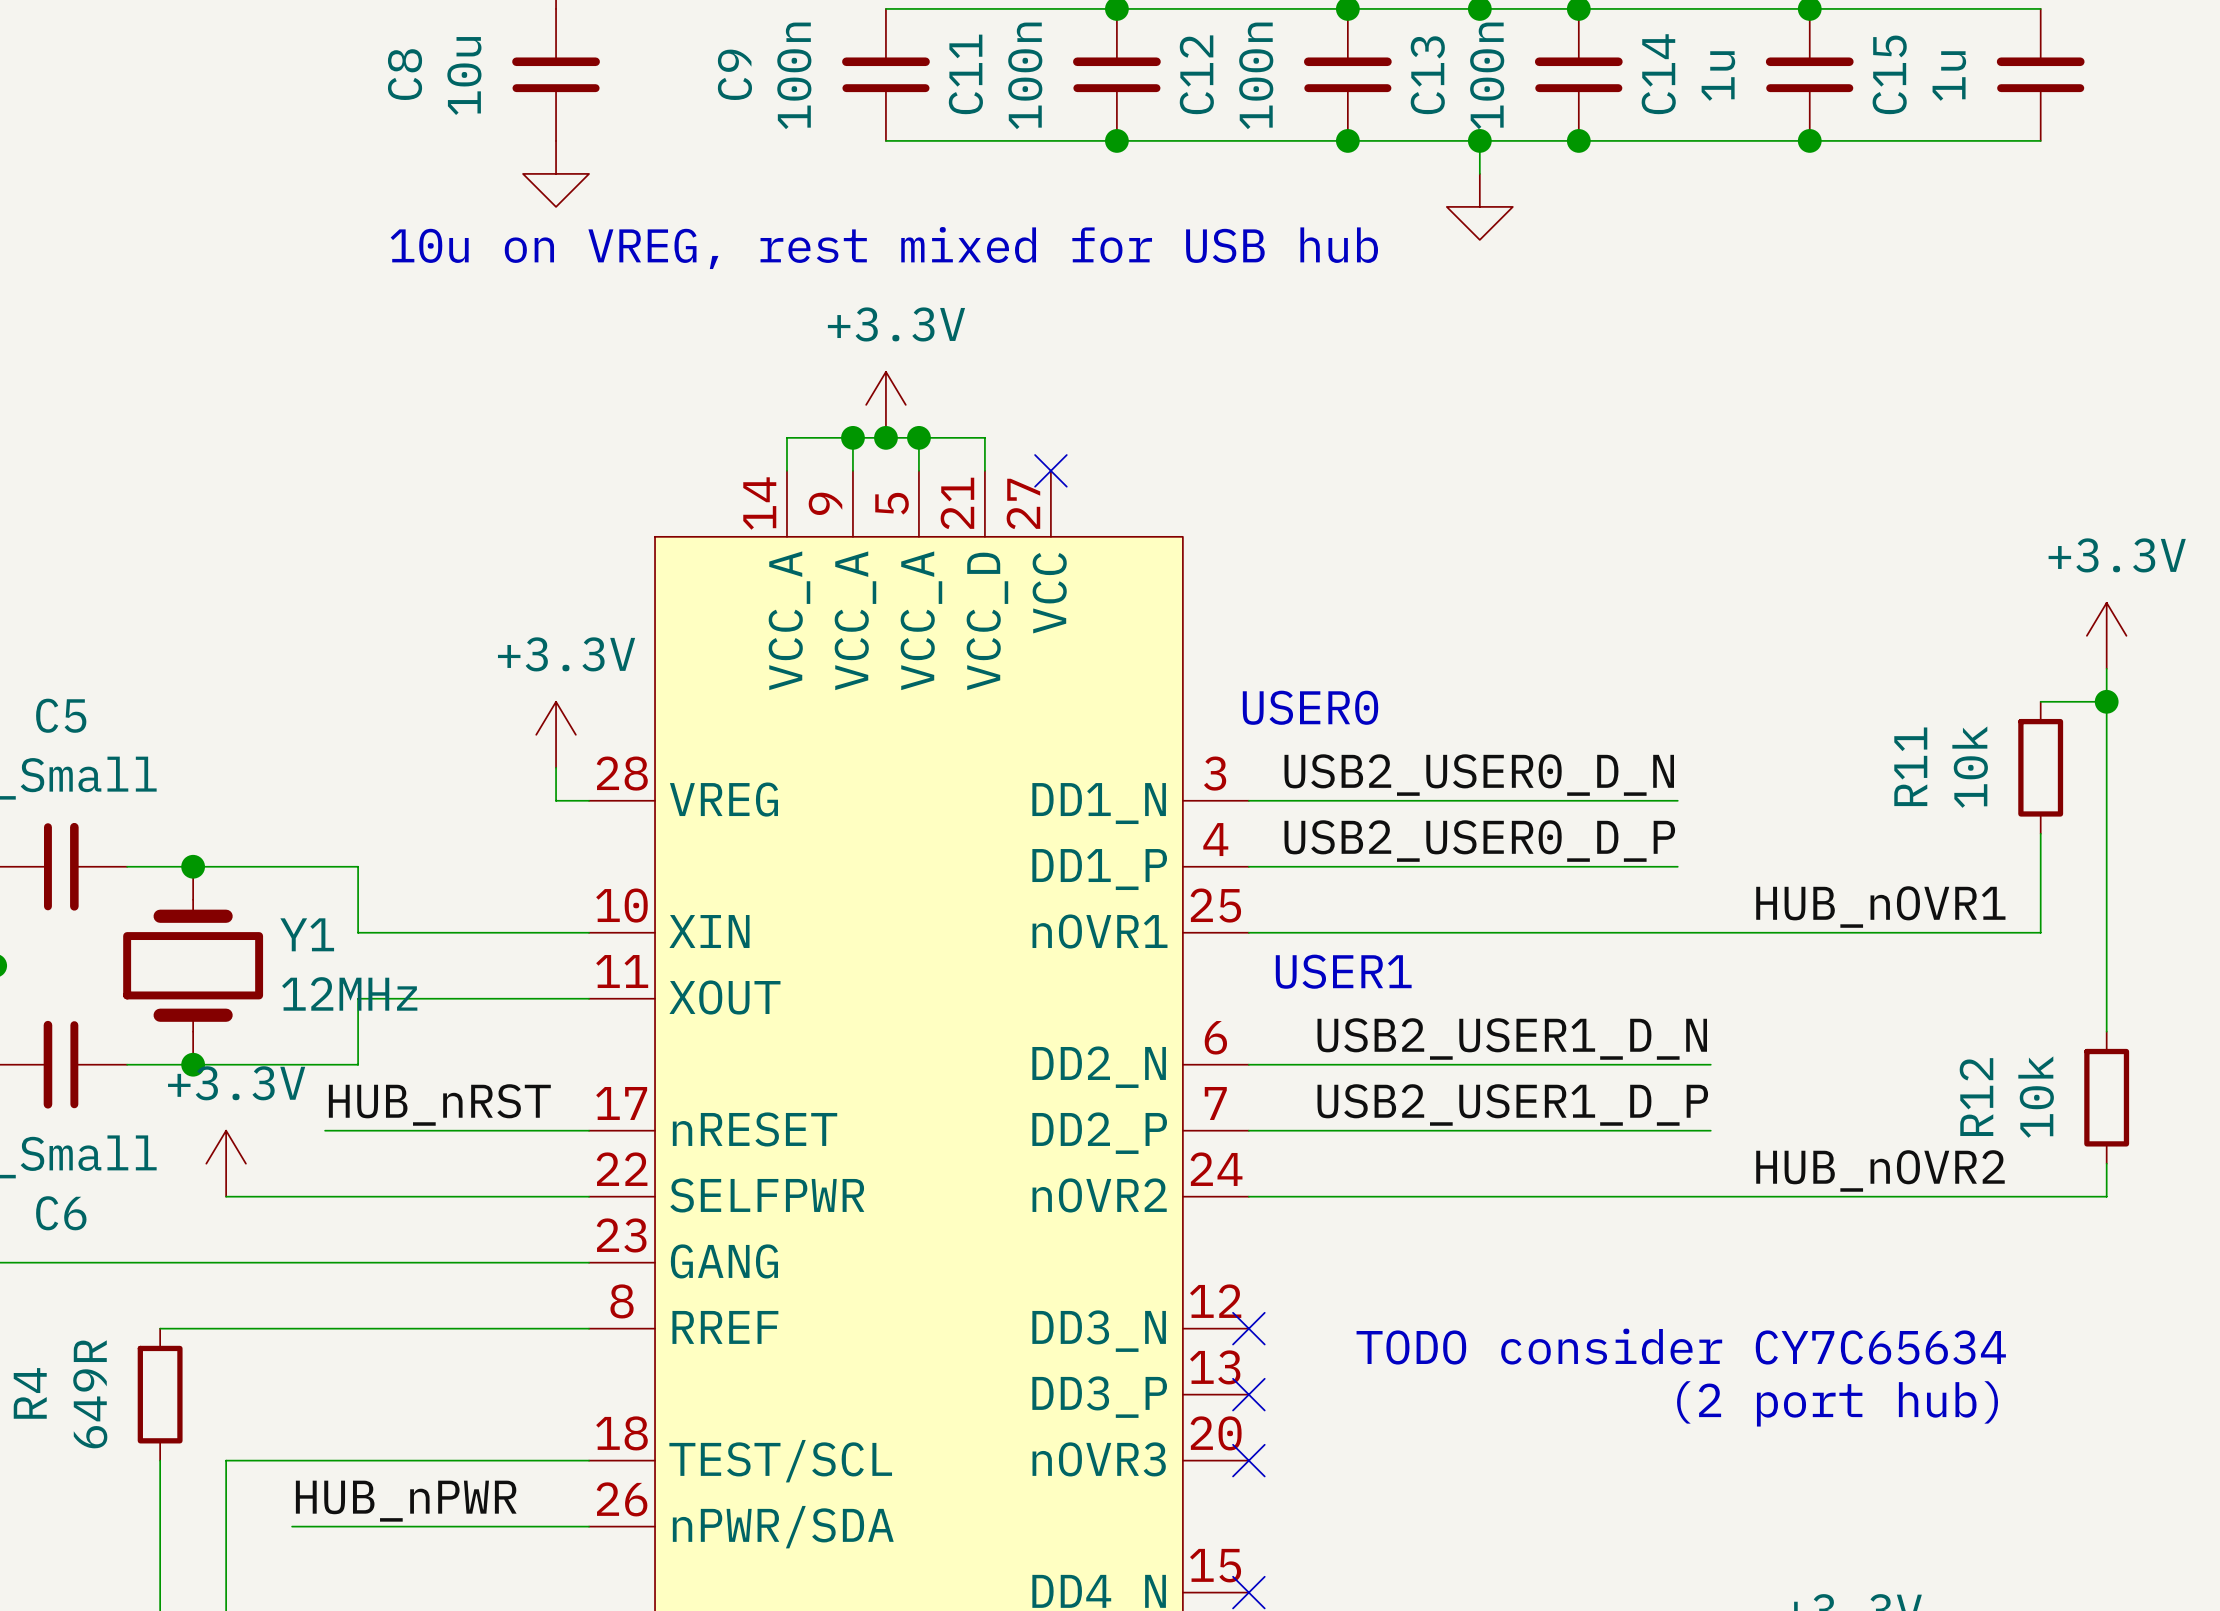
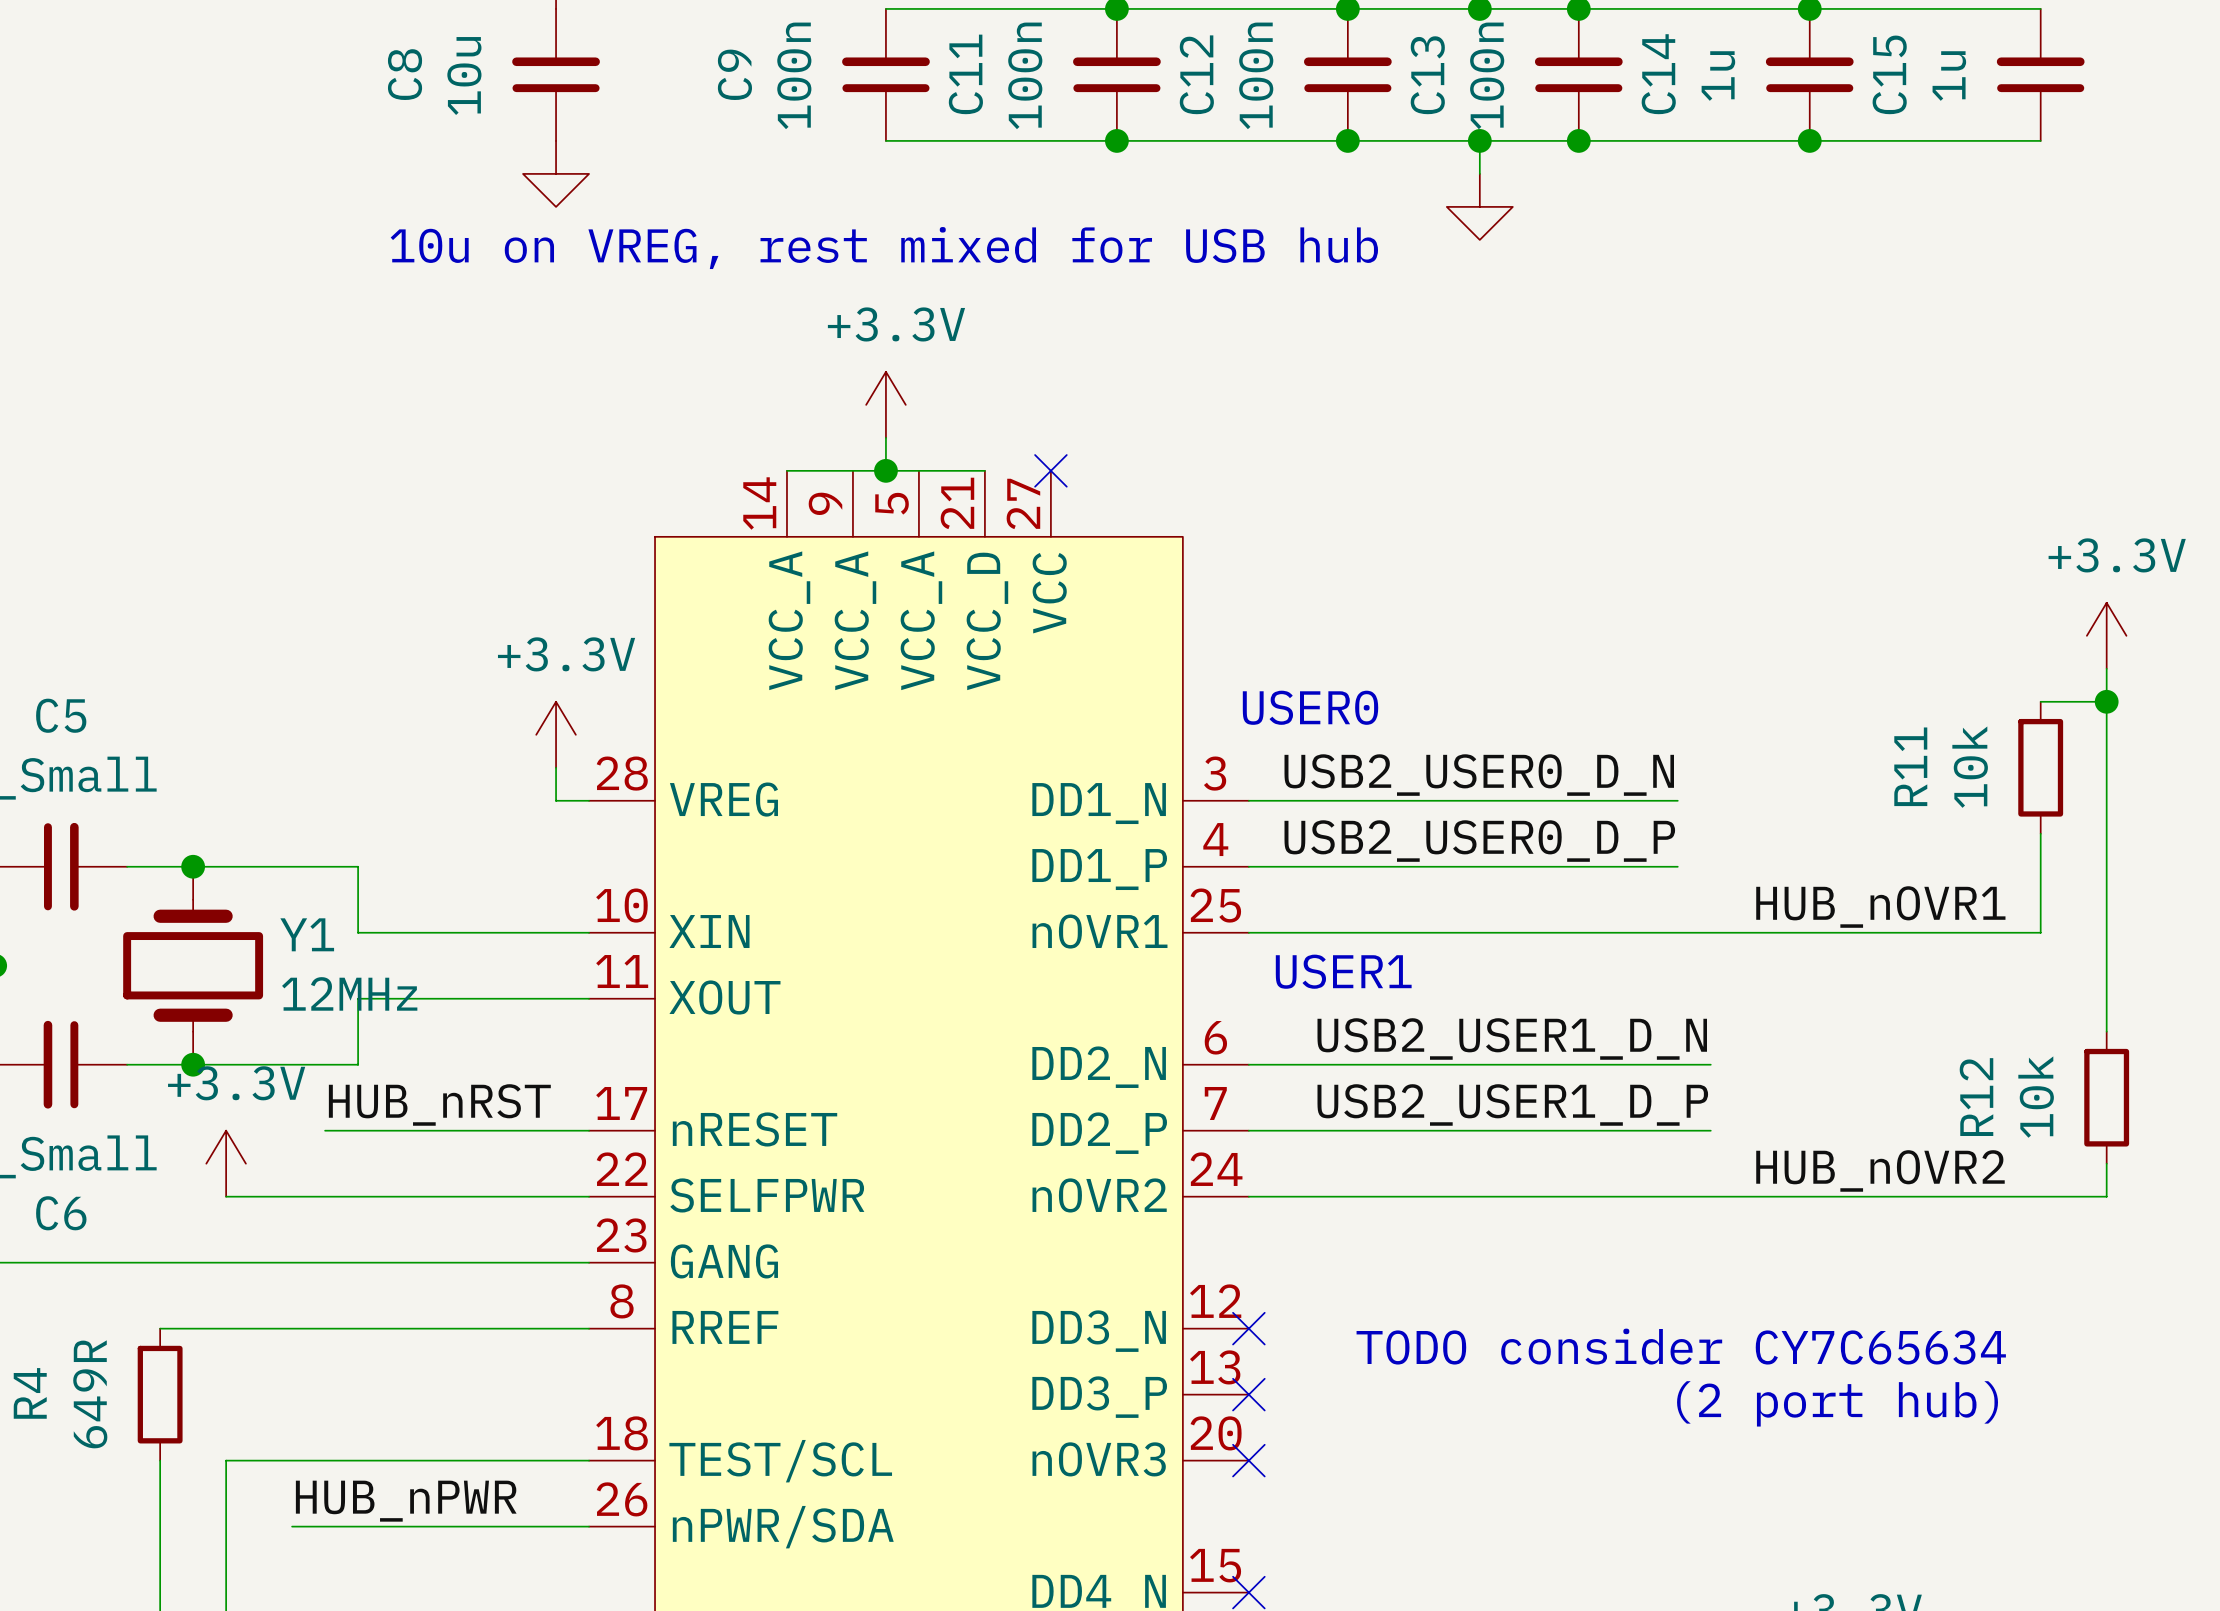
wire: (852, 437) (852, 470) -> none
junction: (852, 437) -> none
junction: (885, 437) -> none
wire: (918, 437) (918, 470) -> (885, 437) (885, 470)
junction: (918, 437) -> none
wire: (786, 470) (786, 437) (984, 437) (984, 470) -> (786, 470) (984, 470)
junction: none -> (885, 470)

